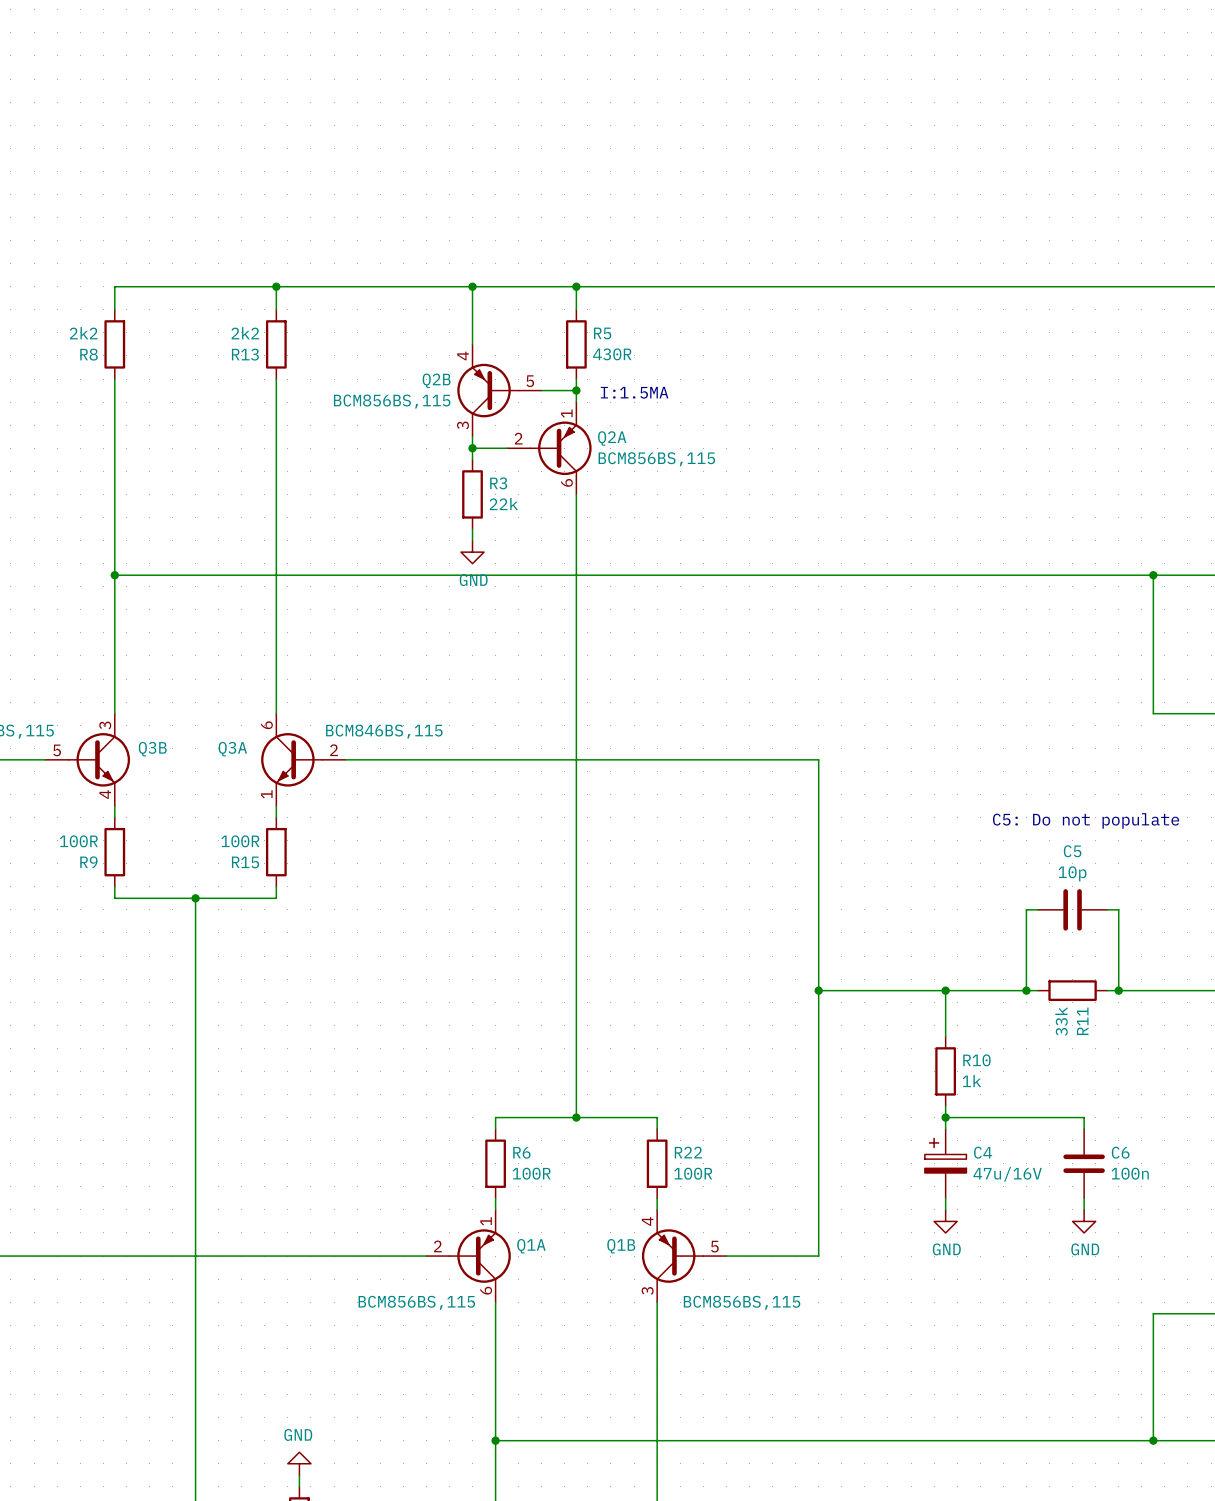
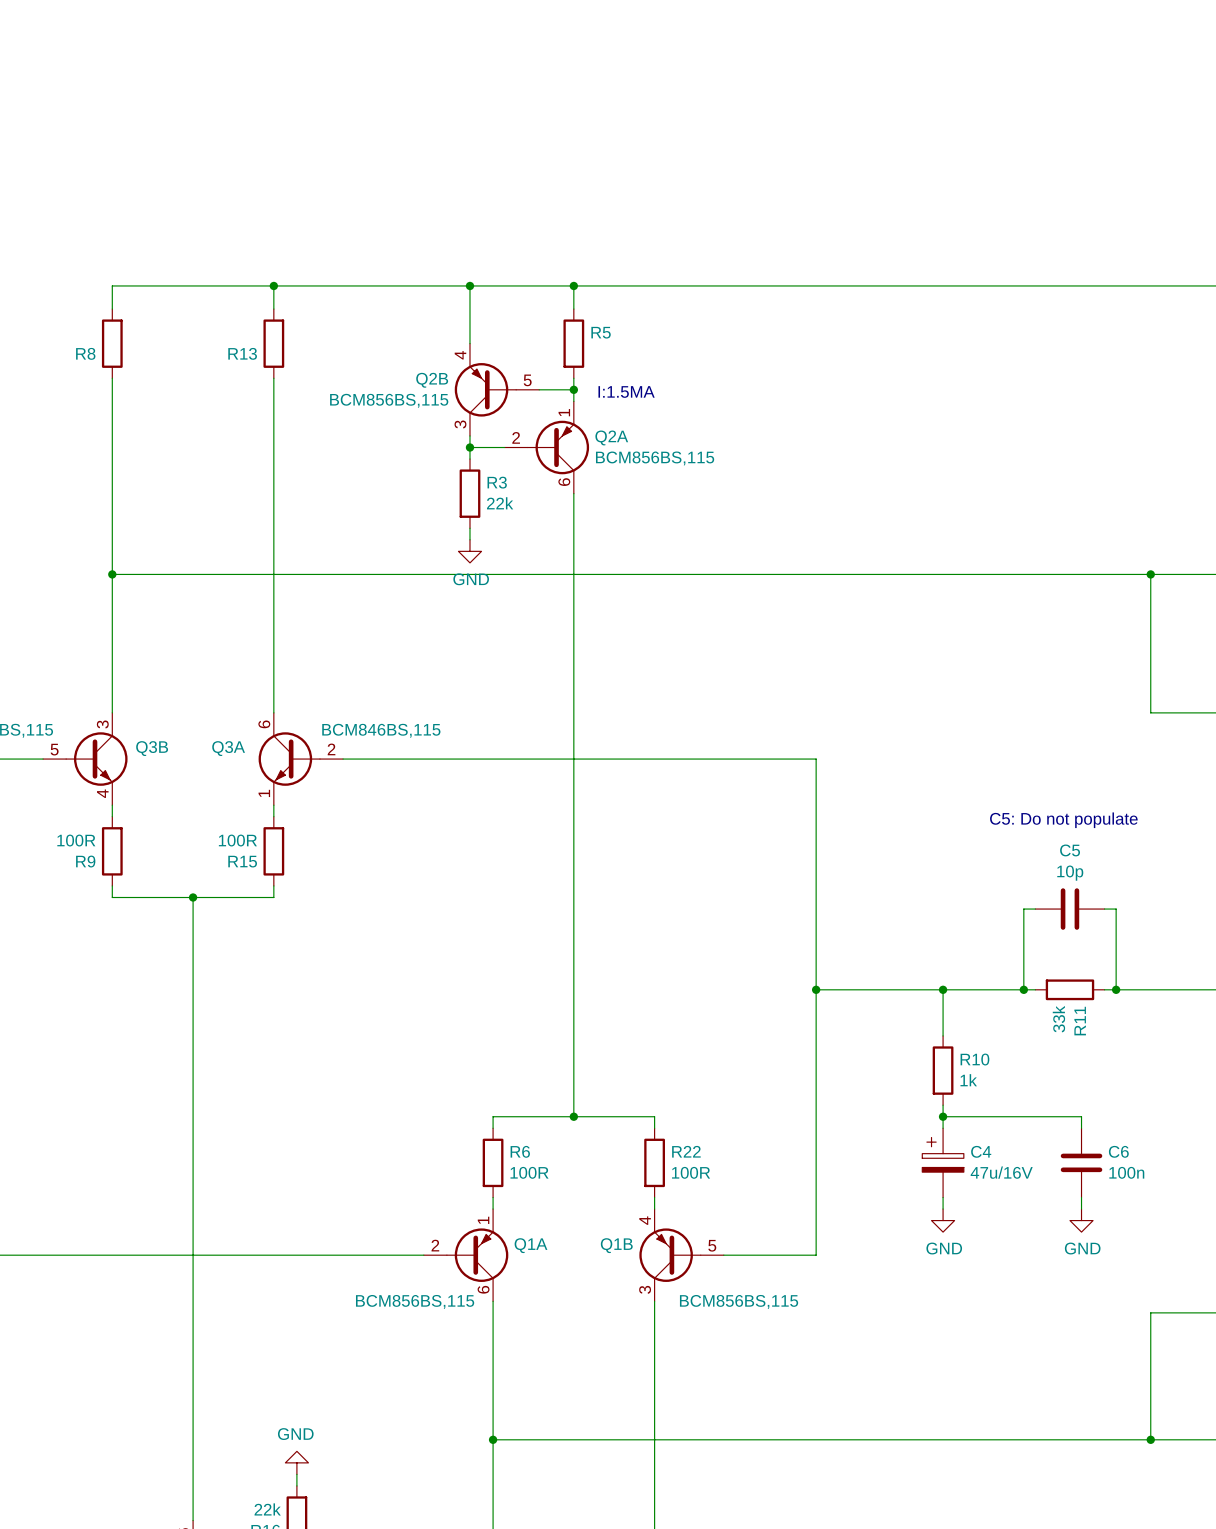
R8 value: 2k2 (83, 333) -> none
R13 value: 2k2 (245, 333) -> none
R5 value: 430R (612, 354) -> none

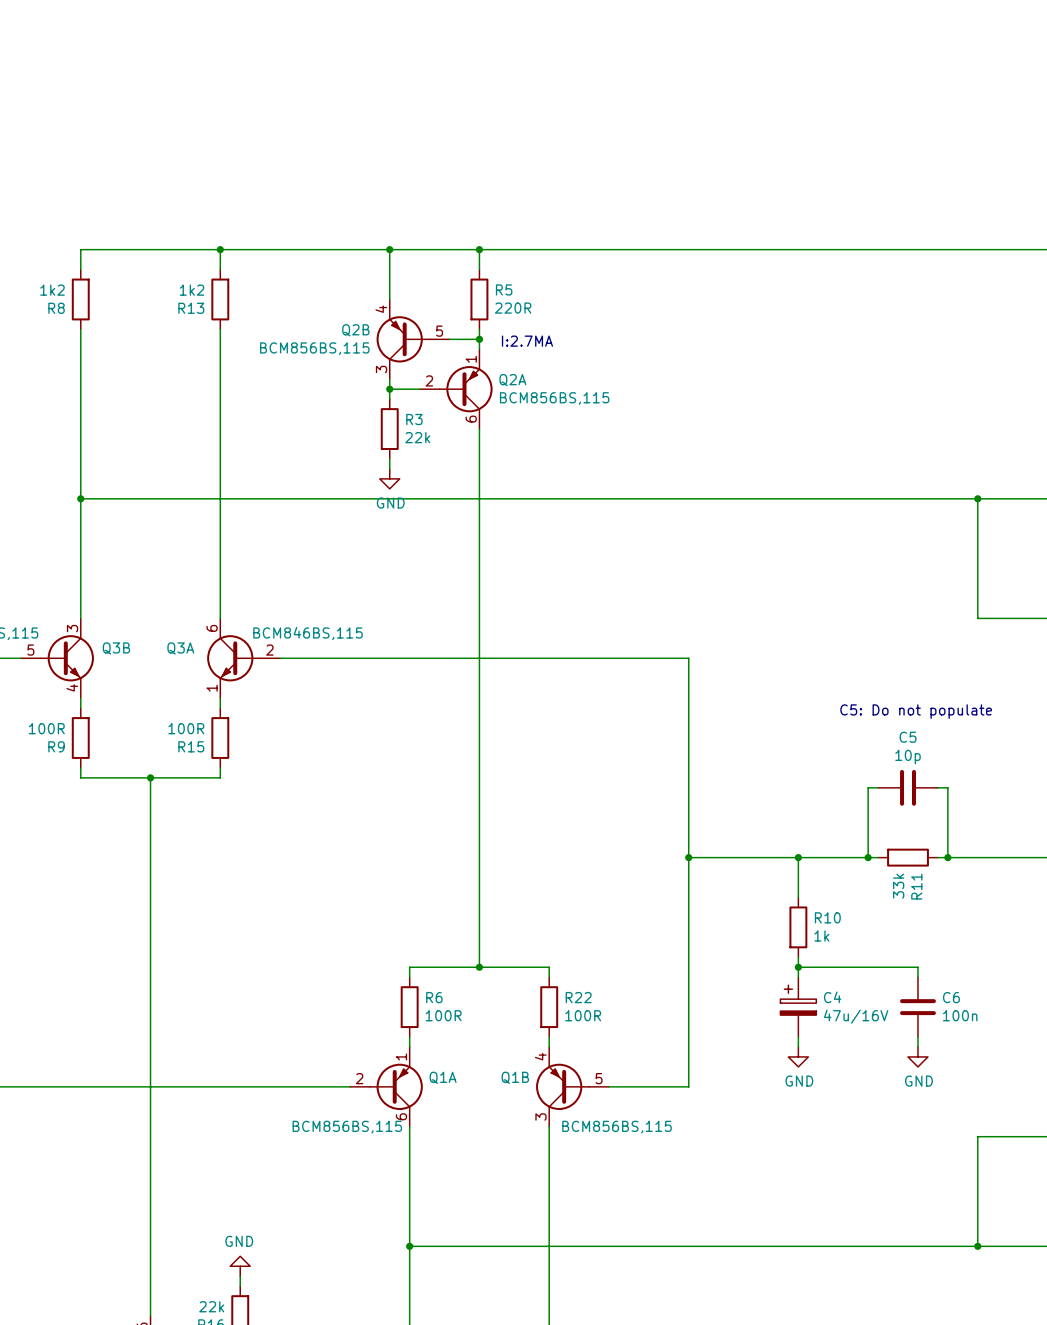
R8 value: none -> 1k2 (52, 290)
R13 value: none -> 1k2 (192, 290)
R5 value: none -> 220R (513, 308)
text: I:1.5MA (626, 391) -> I:2.7MA (527, 341)

